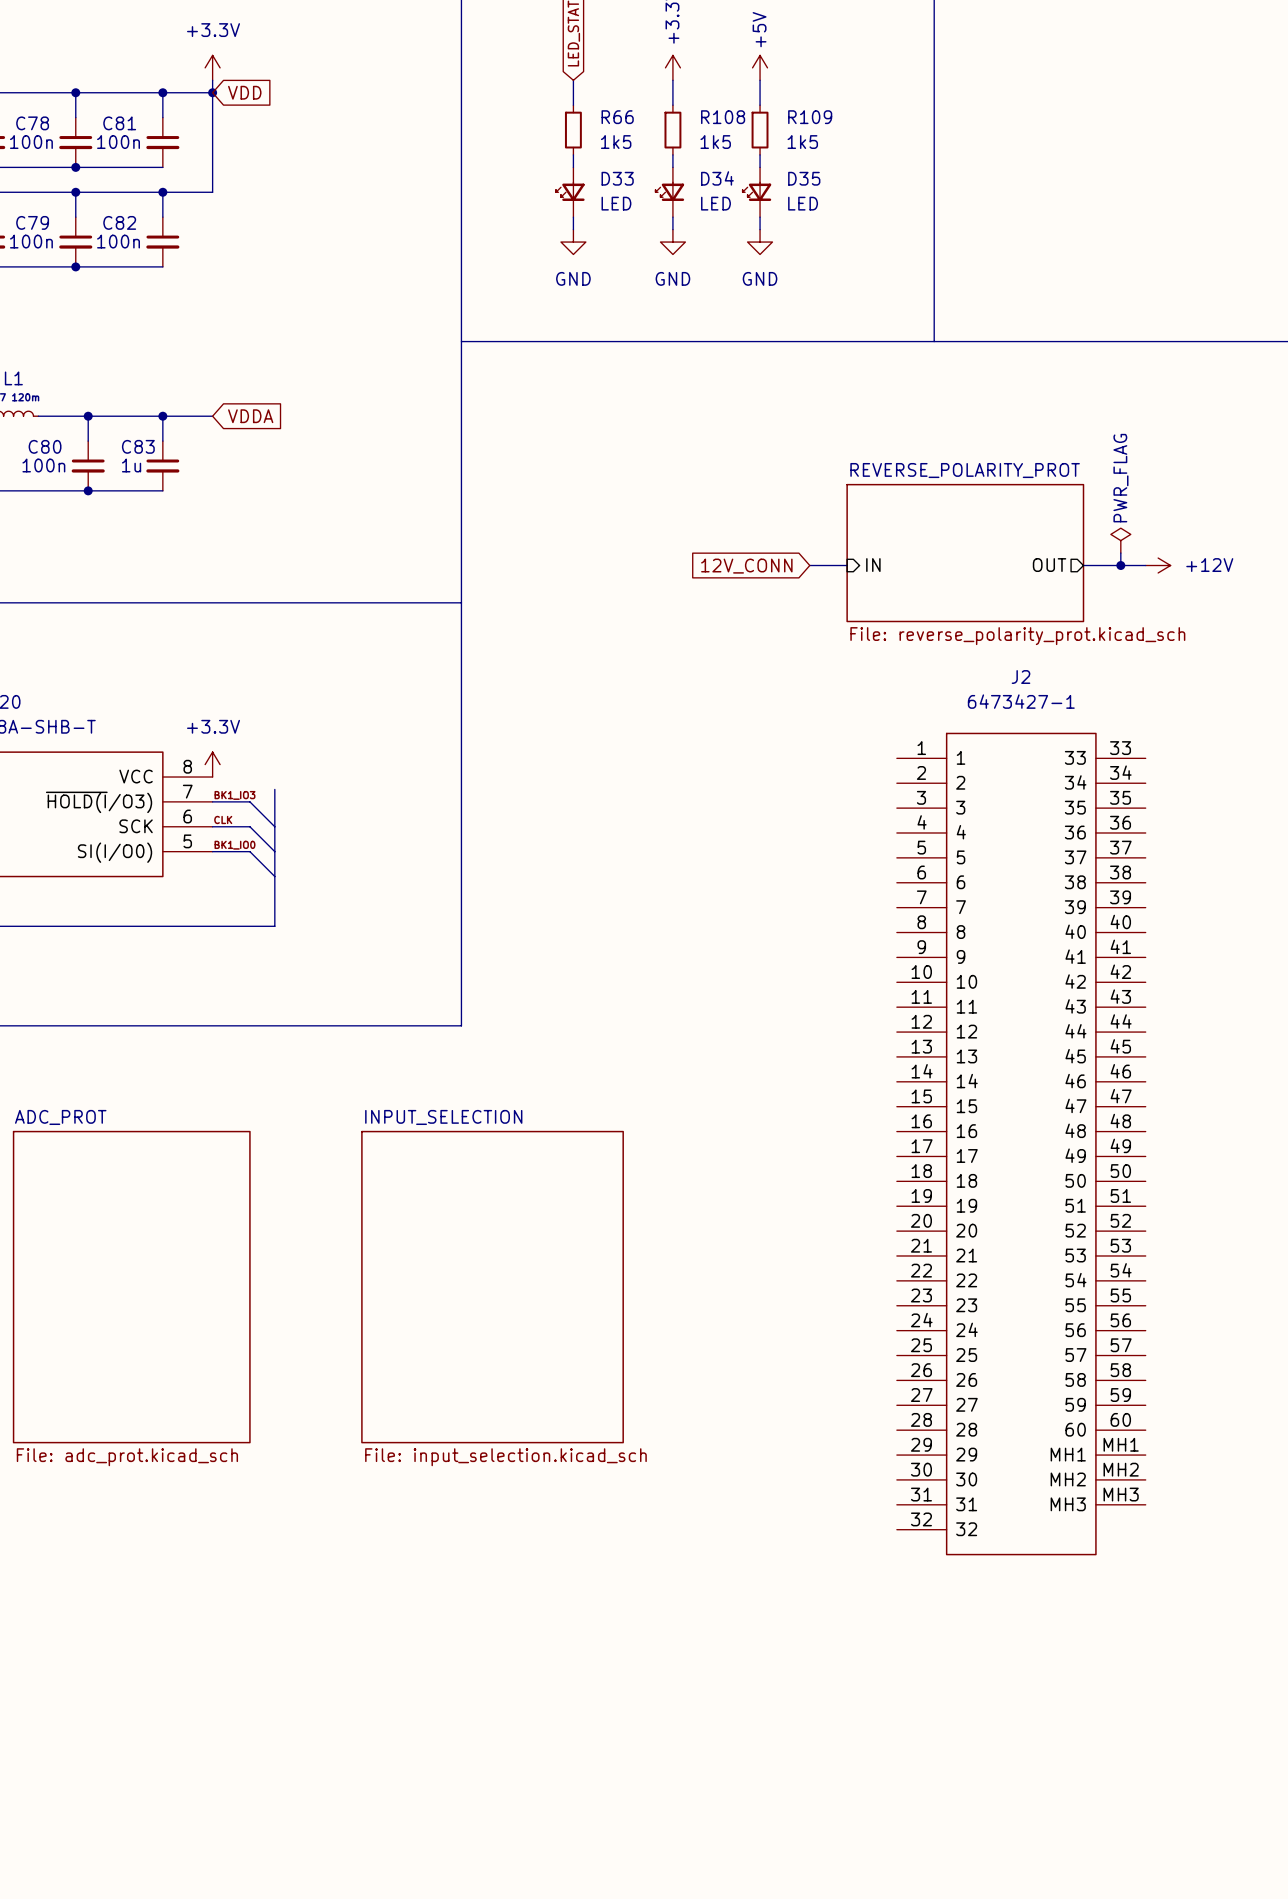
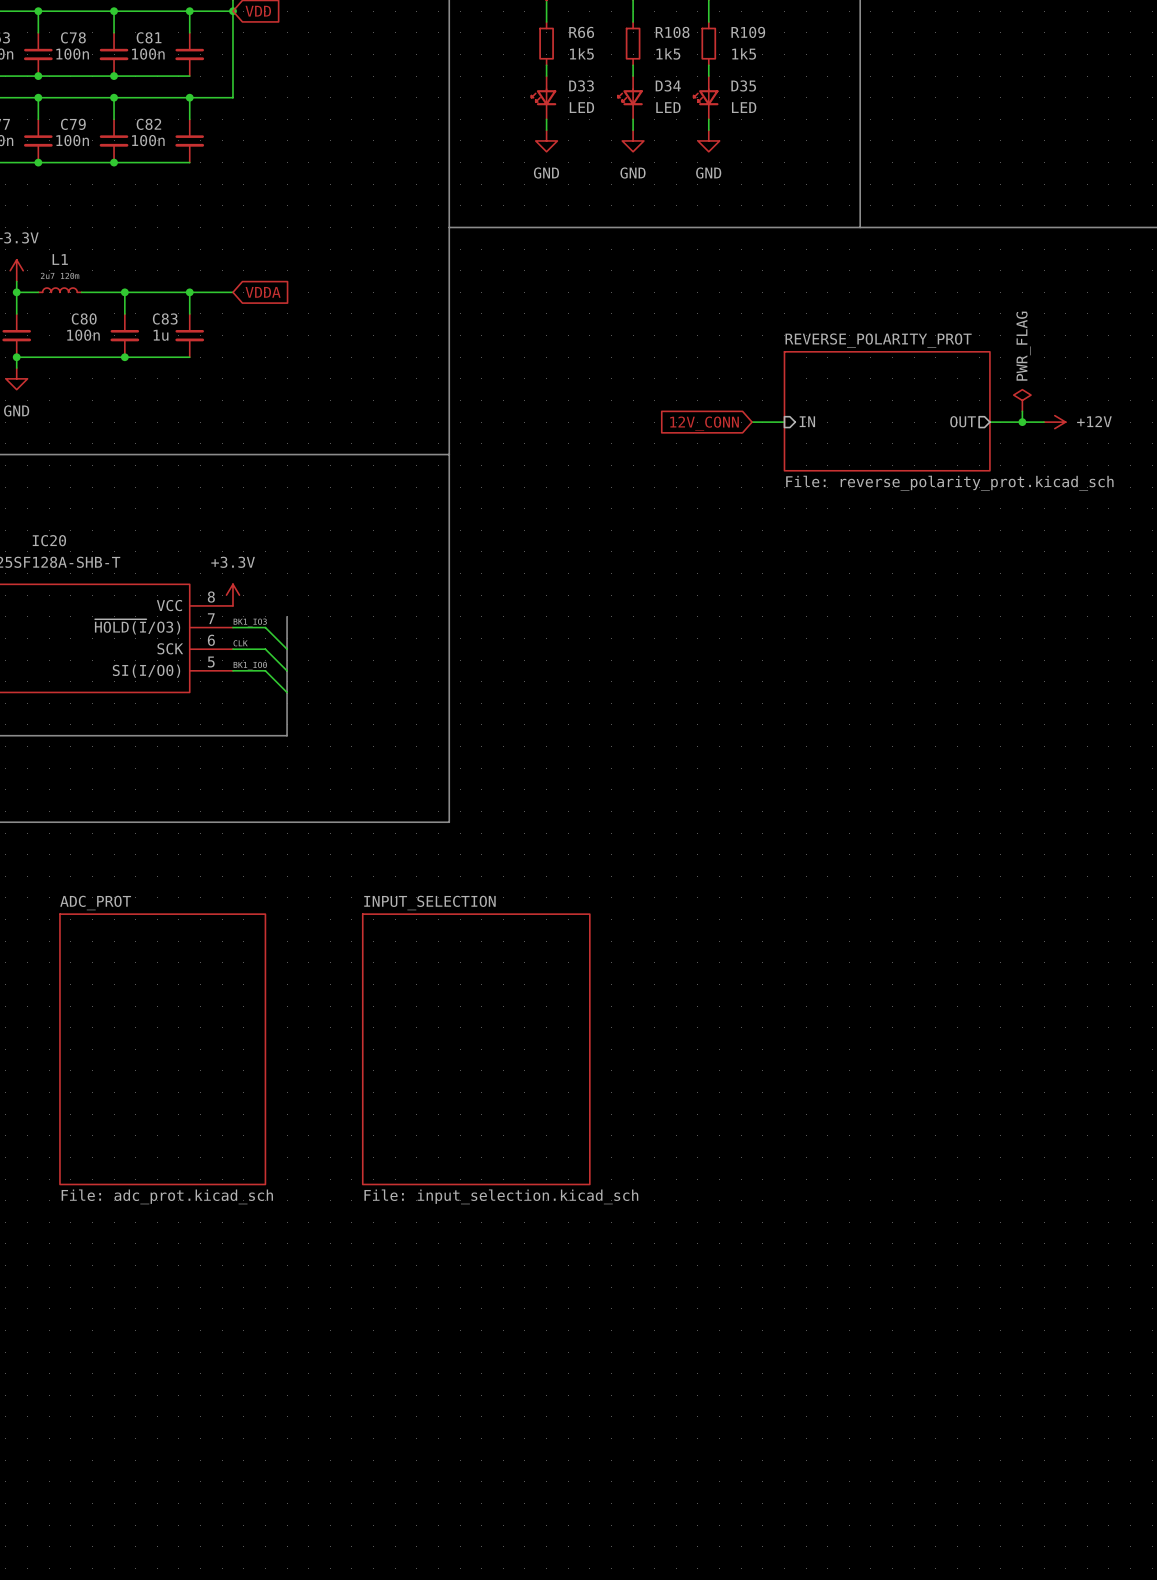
J2: 6473427-1 (1021, 1144) -> none

